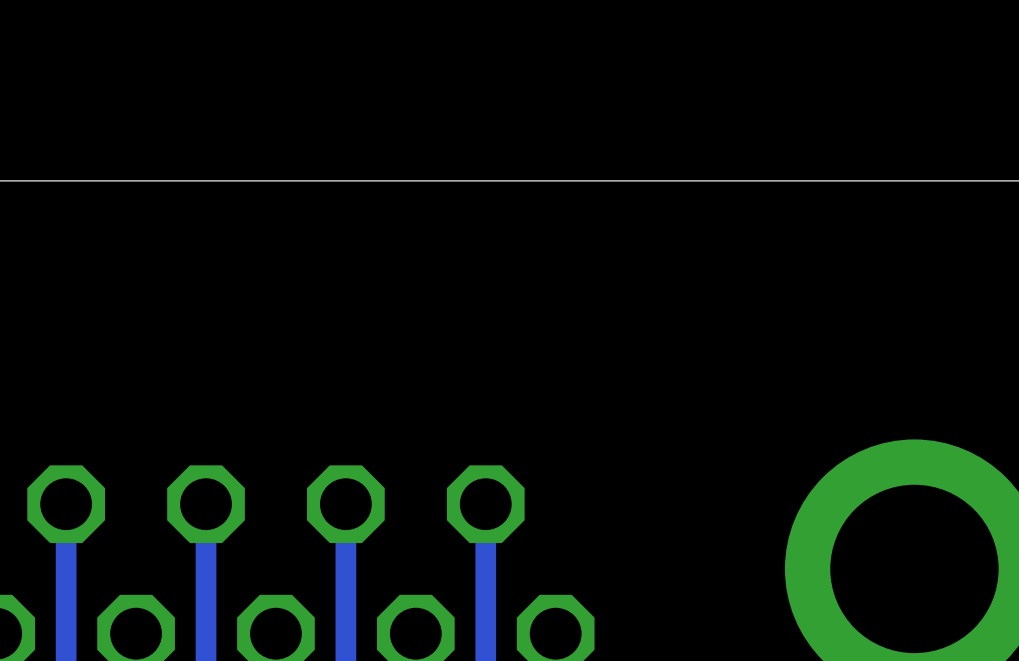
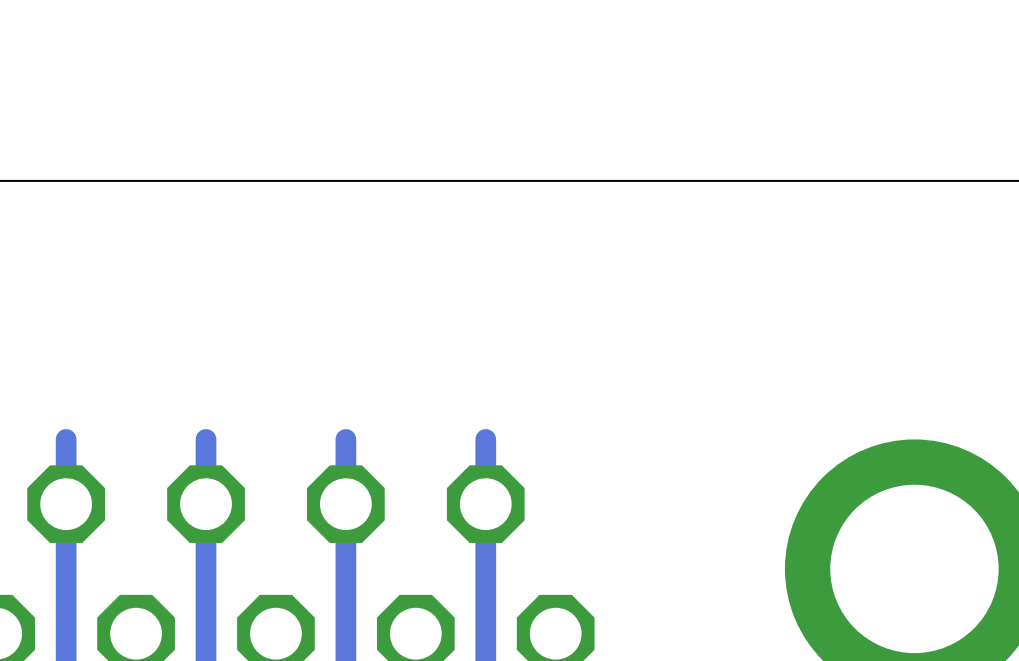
bottom track: none -> (66, 439) (66, 504)
bottom track: none -> (206, 439) (206, 504)
bottom track: none -> (345, 439) (345, 504)
bottom track: none -> (485, 439) (485, 504)

